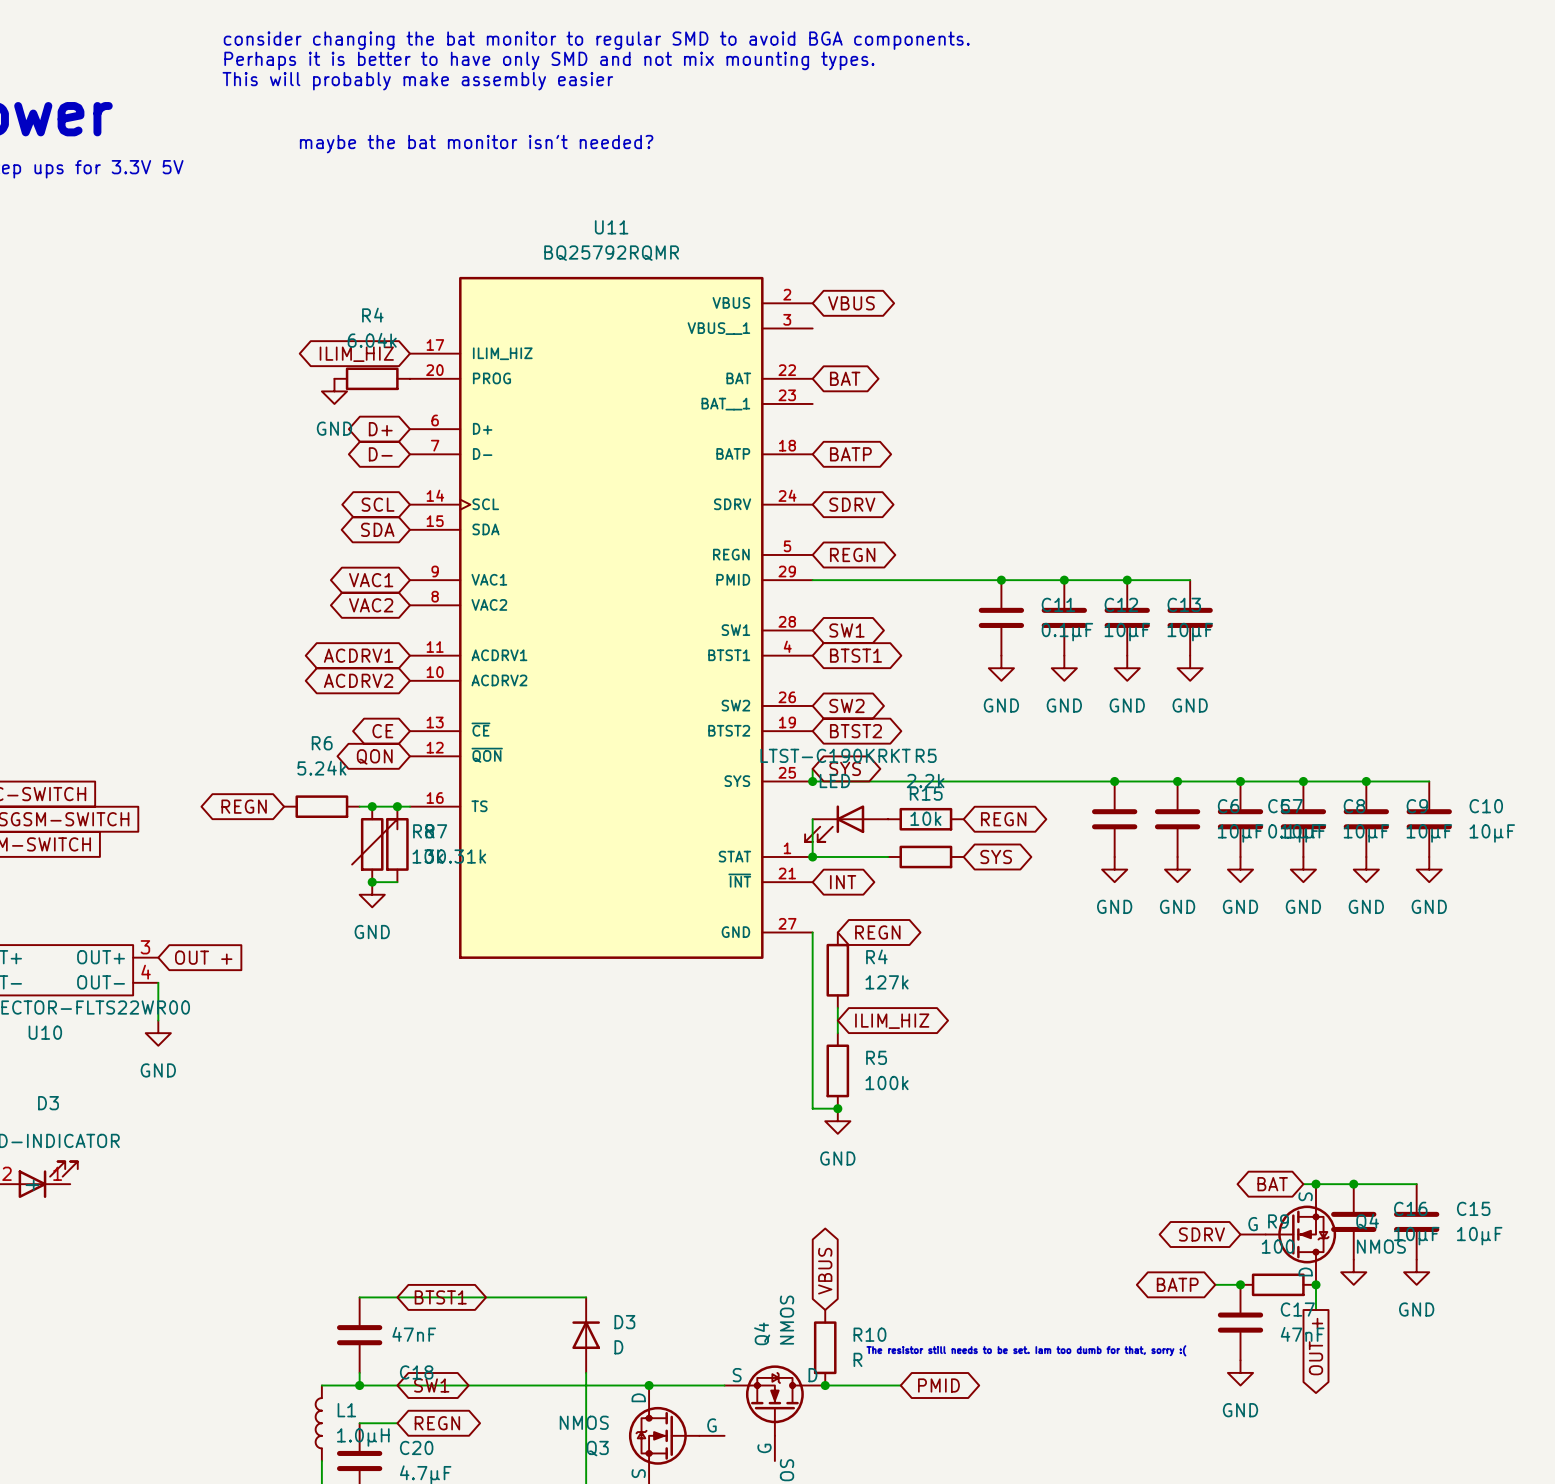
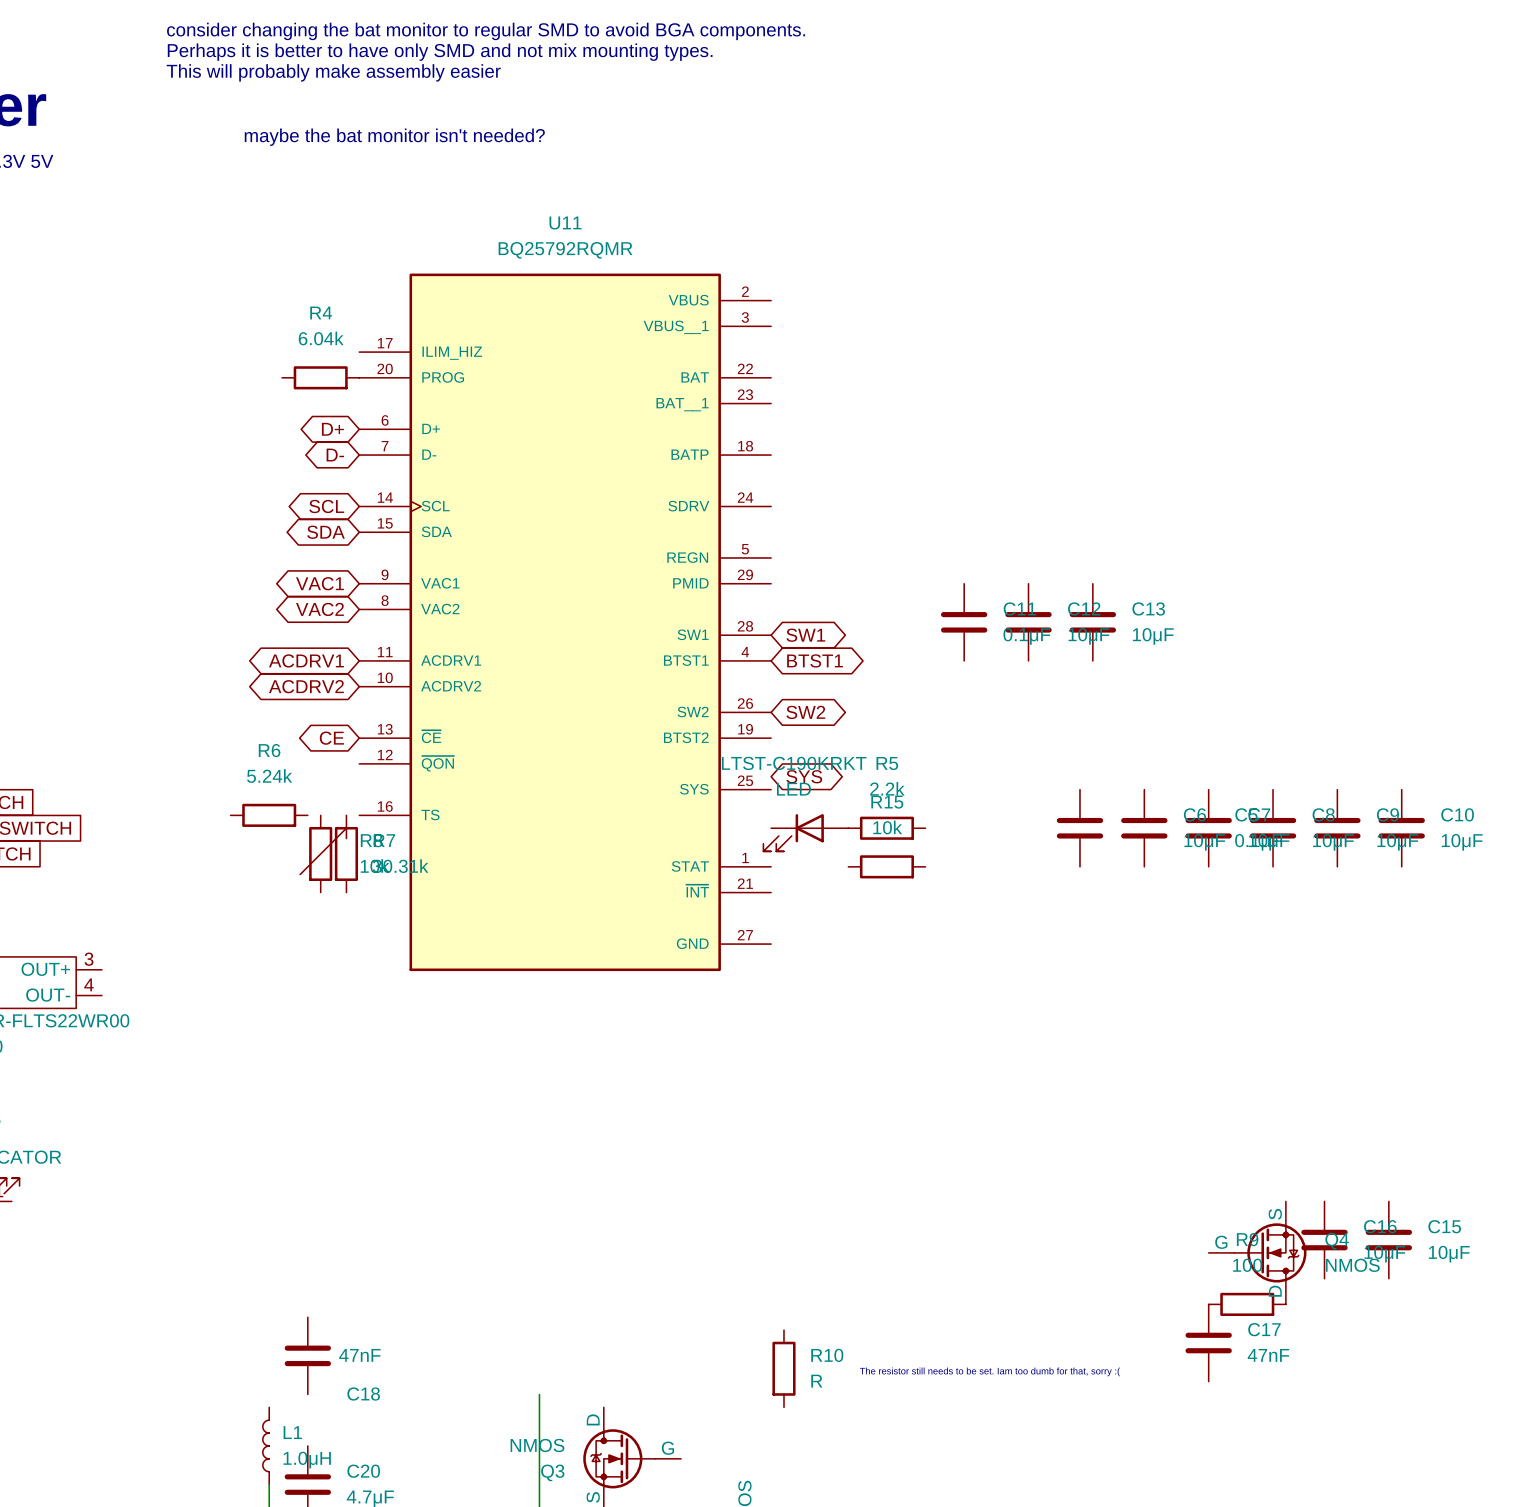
global label: VBUS (851, 303) -> none
global label: ILIM_HIZ (356, 354) -> none
global label: BAT (845, 378) -> none
power symbol: GND (334, 391) -> none
global label: BATP (850, 454) -> none
global label: SDRV (852, 504) -> none
global label: REGN (852, 554) -> none
wire: (812, 580) (1190, 580) -> none
junction: (1001, 580) -> none
junction: (1064, 580) -> none
junction: (1127, 580) -> none
part: (1190, 617) -> none
power symbol: GND (1001, 668) -> none
power symbol: GND (1064, 668) -> none
power symbol: GND (1127, 668) -> none
power symbol: GND (1190, 668) -> none
global label: BTST2 (855, 731) -> none
global label: QON (374, 756) -> none
wire: (812, 768) (812, 781) (1429, 781) -> none
junction: (812, 781) -> none
junction: (1114, 781) -> none
junction: (1177, 781) -> none
junction: (1240, 781) -> none
junction: (1303, 781) -> none
junction: (1366, 781) -> none
global label: REGN (244, 806) -> none
wire: (359, 806) (409, 806) -> none
junction: (372, 806) -> none
junction: (397, 806) -> none
wire: (812, 819) (812, 856) (888, 856) -> none
global label: REGN (1003, 819) -> none
junction: (812, 856) -> none
global label: SYS (996, 856) -> none
power symbol: GND (1114, 869) -> none
power symbol: GND (1177, 869) -> none
power symbol: GND (1240, 869) -> none
power symbol: GND (1303, 869) -> none
power symbol: GND (1366, 869) -> none
power symbol: GND (1429, 869) -> none
wire: (372, 882) (397, 882) -> none
junction: (372, 882) -> none
global label: INT (843, 882) -> none
power symbol: GND (372, 894) -> none
wire: (812, 932) (812, 1108) (837, 1108) -> none
global label: REGN (877, 932) -> none
global label: OUT + (203, 957) -> none
R4: 127k (837, 970) -> none
wire: (158, 982) (158, 1020) -> none
wire: (837, 1007) (837, 1033) -> none
global label: ILIM_HIZ (892, 1021) -> none
power symbol: GND (158, 1033) -> none
R5: 100k (837, 1070) -> none
junction: (837, 1108) -> none
power symbol: GND (837, 1121) -> none
global label: BAT (1272, 1184) -> none
wire: (1303, 1184) (1416, 1184) -> none
junction: (1316, 1184) -> none
junction: (1353, 1184) -> none
global label: SDRV (1201, 1234) -> none
global label: VBUS (825, 1271) -> none
power symbol: (1353, 1272) -> none
power symbol: GND (1416, 1272) -> none
global label: BATP (1177, 1284) -> none
wire: (1215, 1284) (1240, 1284) -> none
junction: (1240, 1284) -> none
wire: (1316, 1284) (1316, 1310) -> none
junction: (1316, 1284) -> none
wire: (359, 1297) (586, 1297) -> none
global label: BTST1 (440, 1297) -> none
D3: D (586, 1335) -> none
global label: OUT + (1316, 1346) -> none
wire: (359, 1372) (359, 1385) -> none
power symbol: GND (1240, 1372) -> none
wire: (321, 1385) (724, 1385) -> none
junction: (359, 1385) -> none
global label: SW1 (431, 1385) -> none
junction: (649, 1385) -> none
wire: (825, 1385) (900, 1385) -> none
junction: (825, 1385) -> none
global label: PMID (938, 1385) -> none
Q4: NMOS (774, 1413) -> none
wire: (359, 1423) (397, 1423) -> none
global label: REGN (437, 1423) -> none

